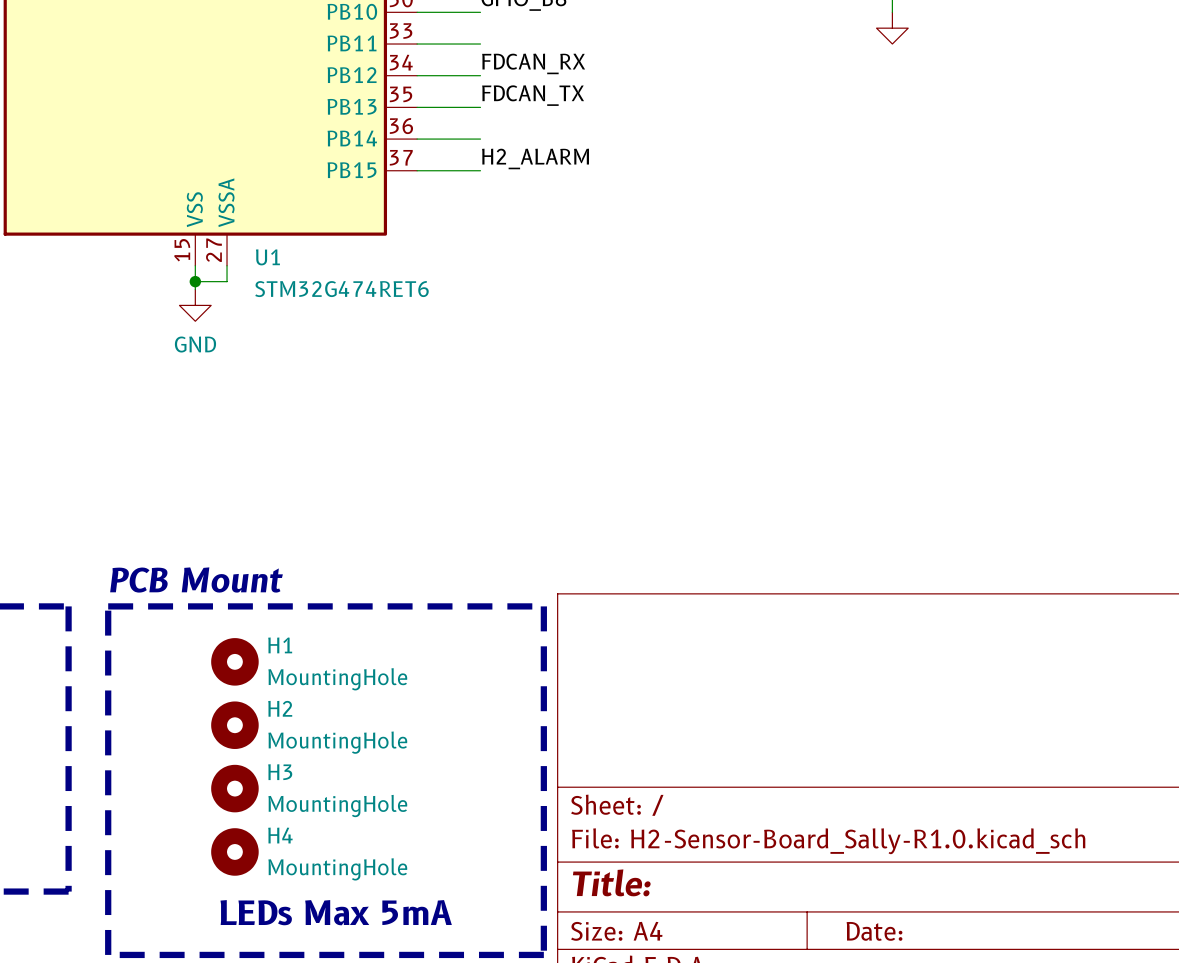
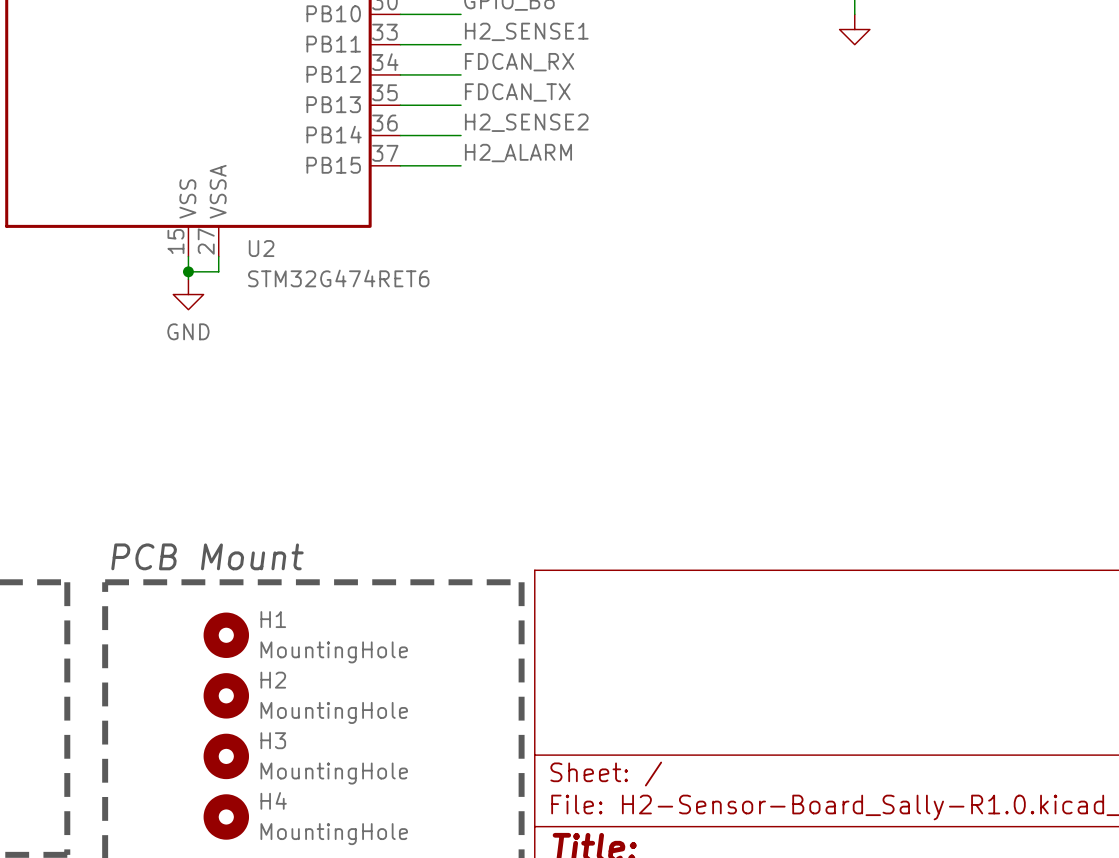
label: none -> H2_SENSE1 (526, 31)
label: none -> H2_SENSE2 (526, 122)
U1 name: U1 (267, 257) -> U2 (261, 248)

